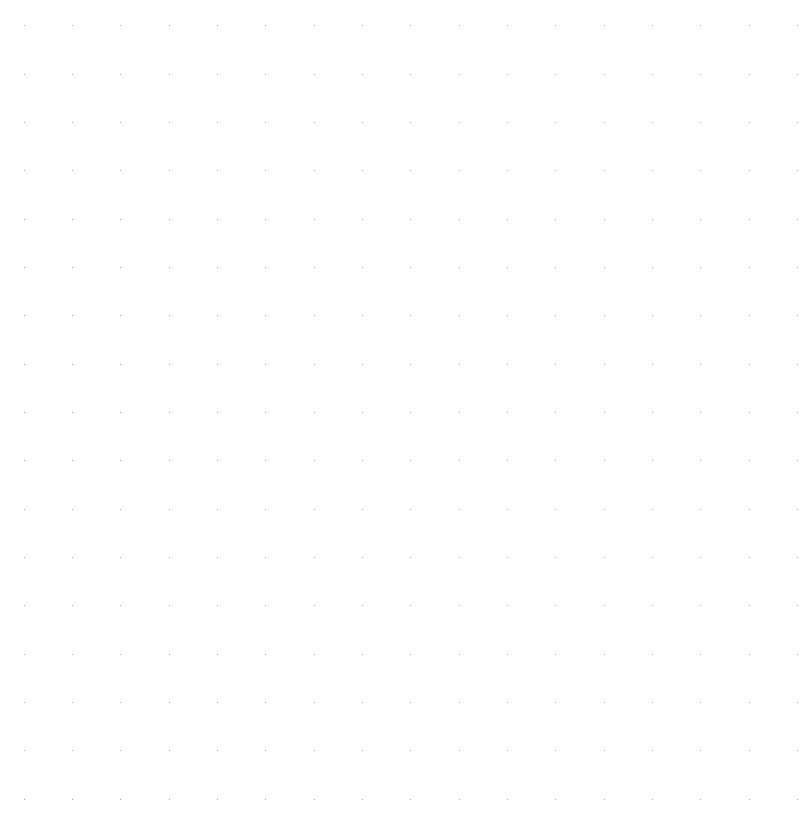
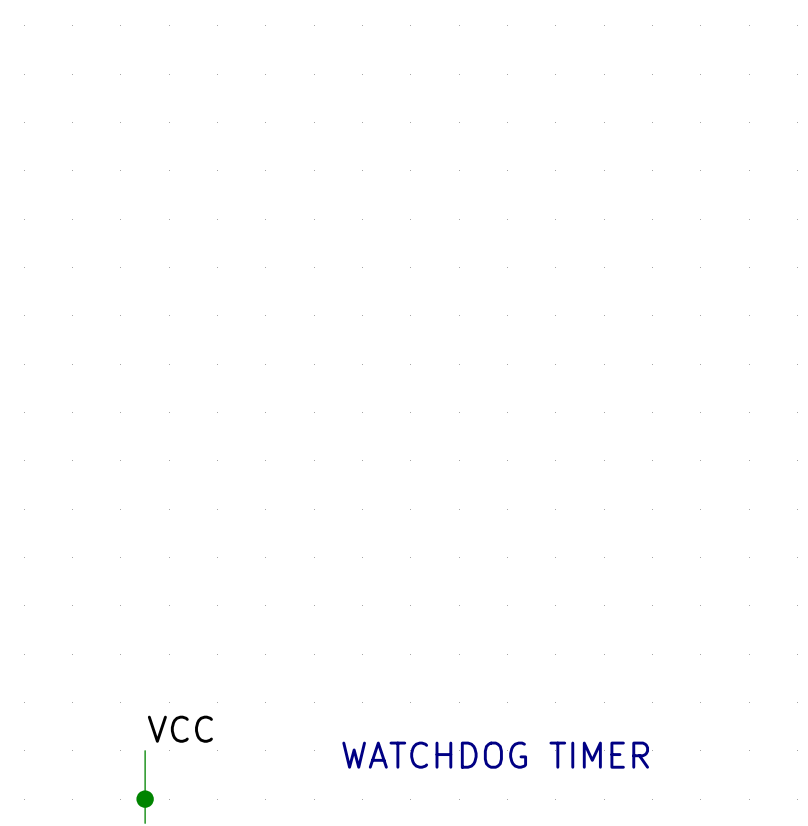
label: none -> VCC (180, 729)
wire: none -> (145, 750) (145, 823)
text: none -> WATCHDOG TIMER (495, 755)
junction: none -> (145, 799)

